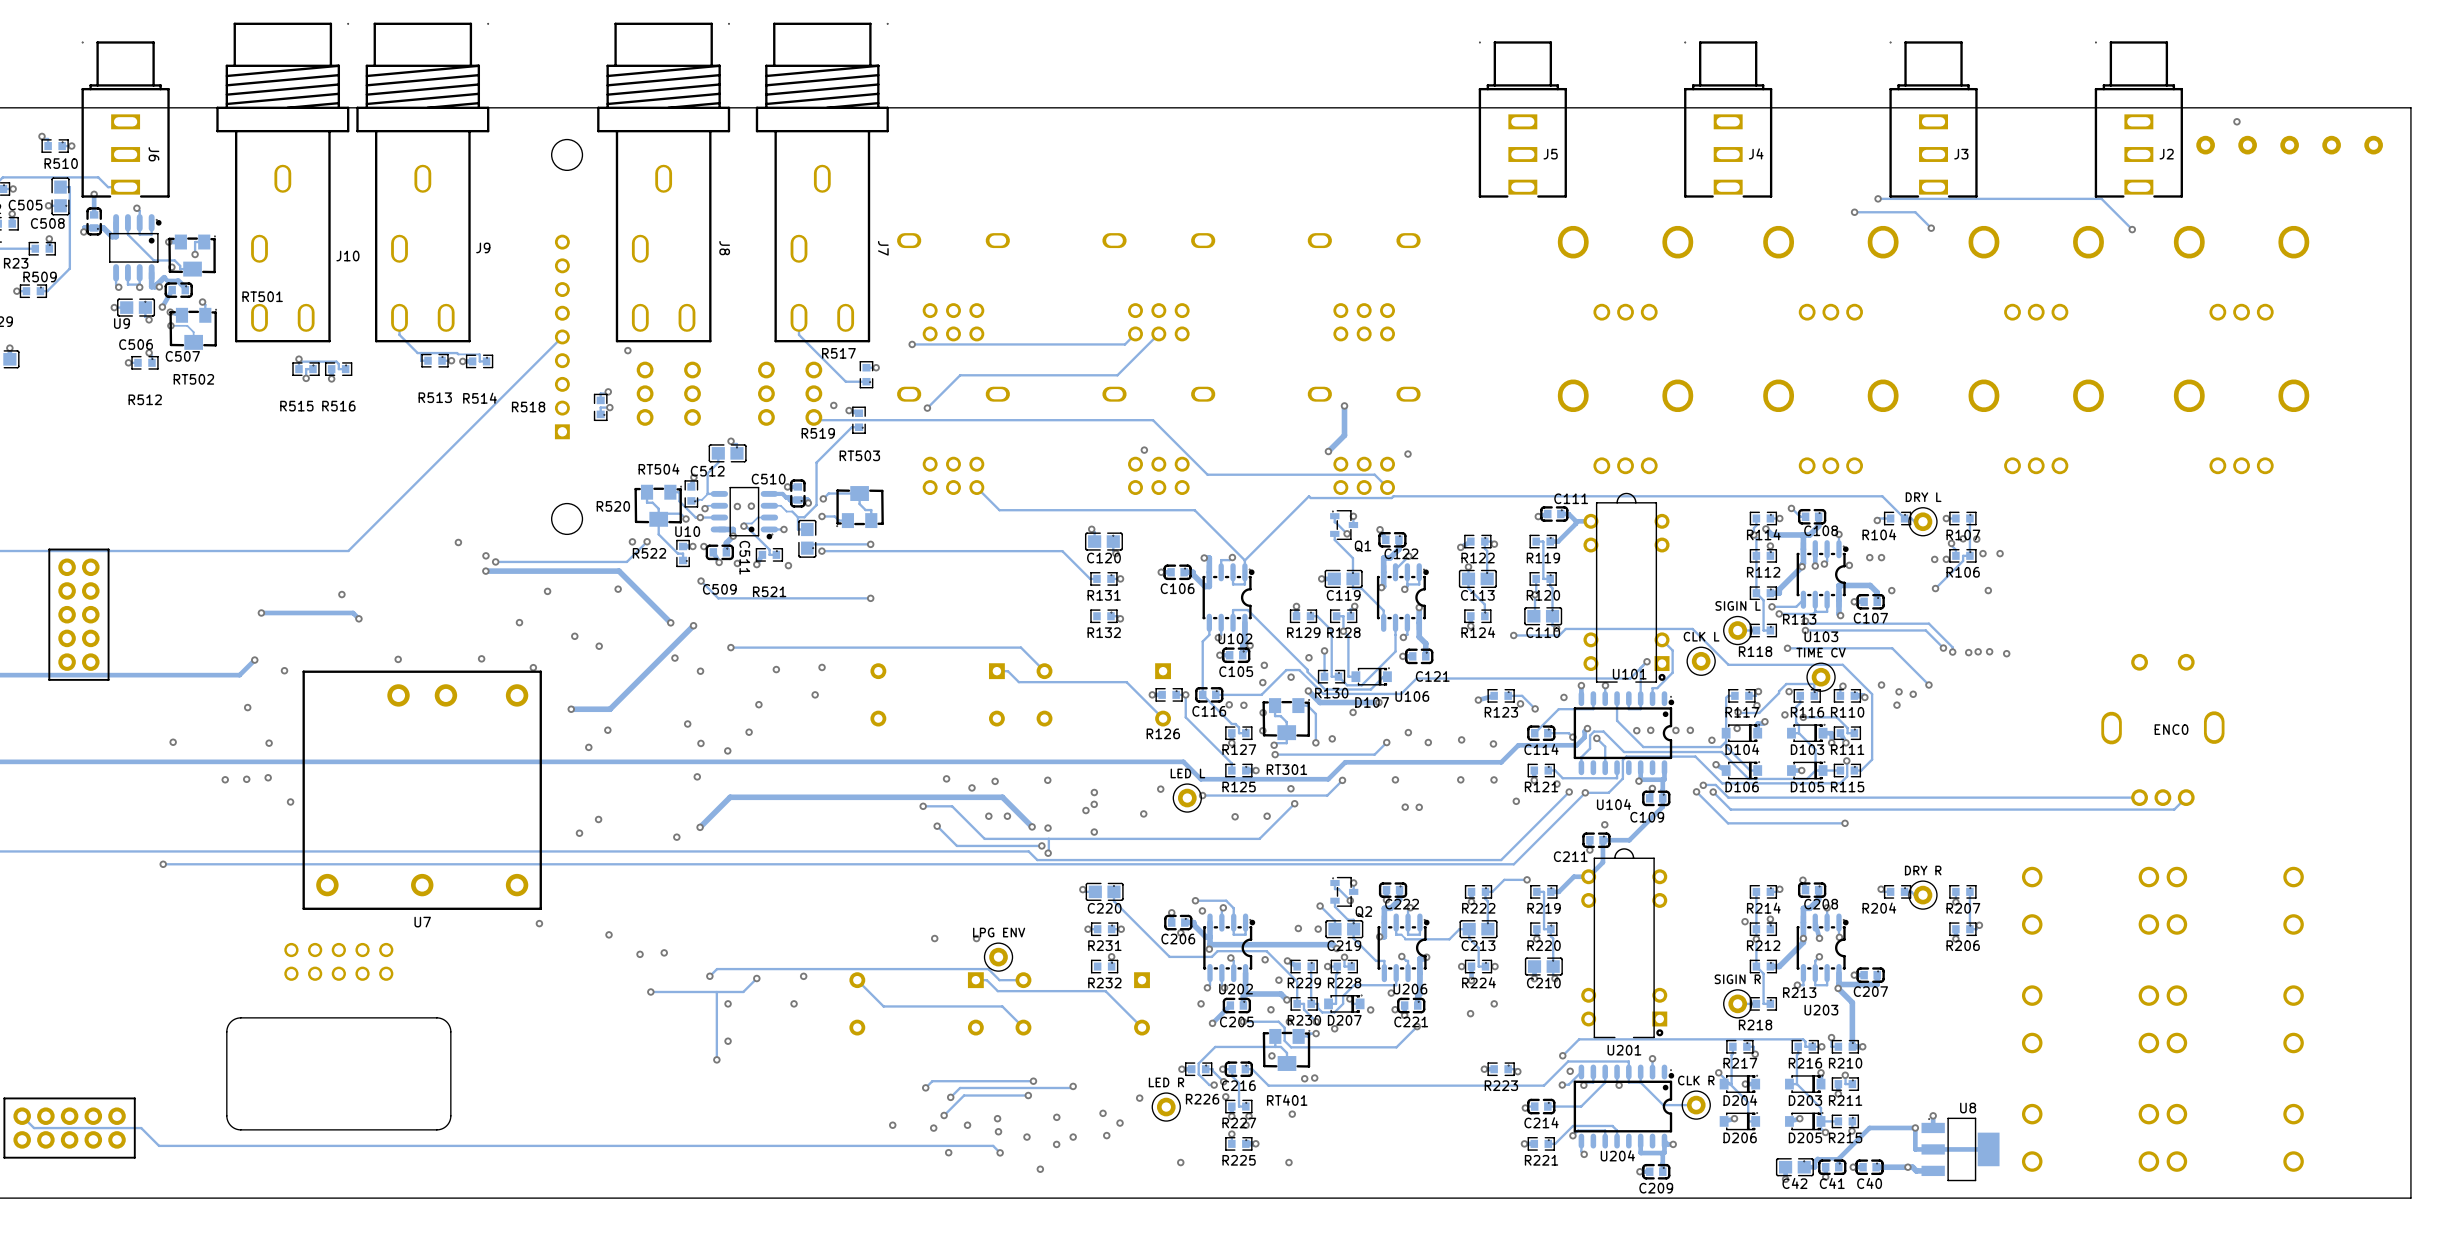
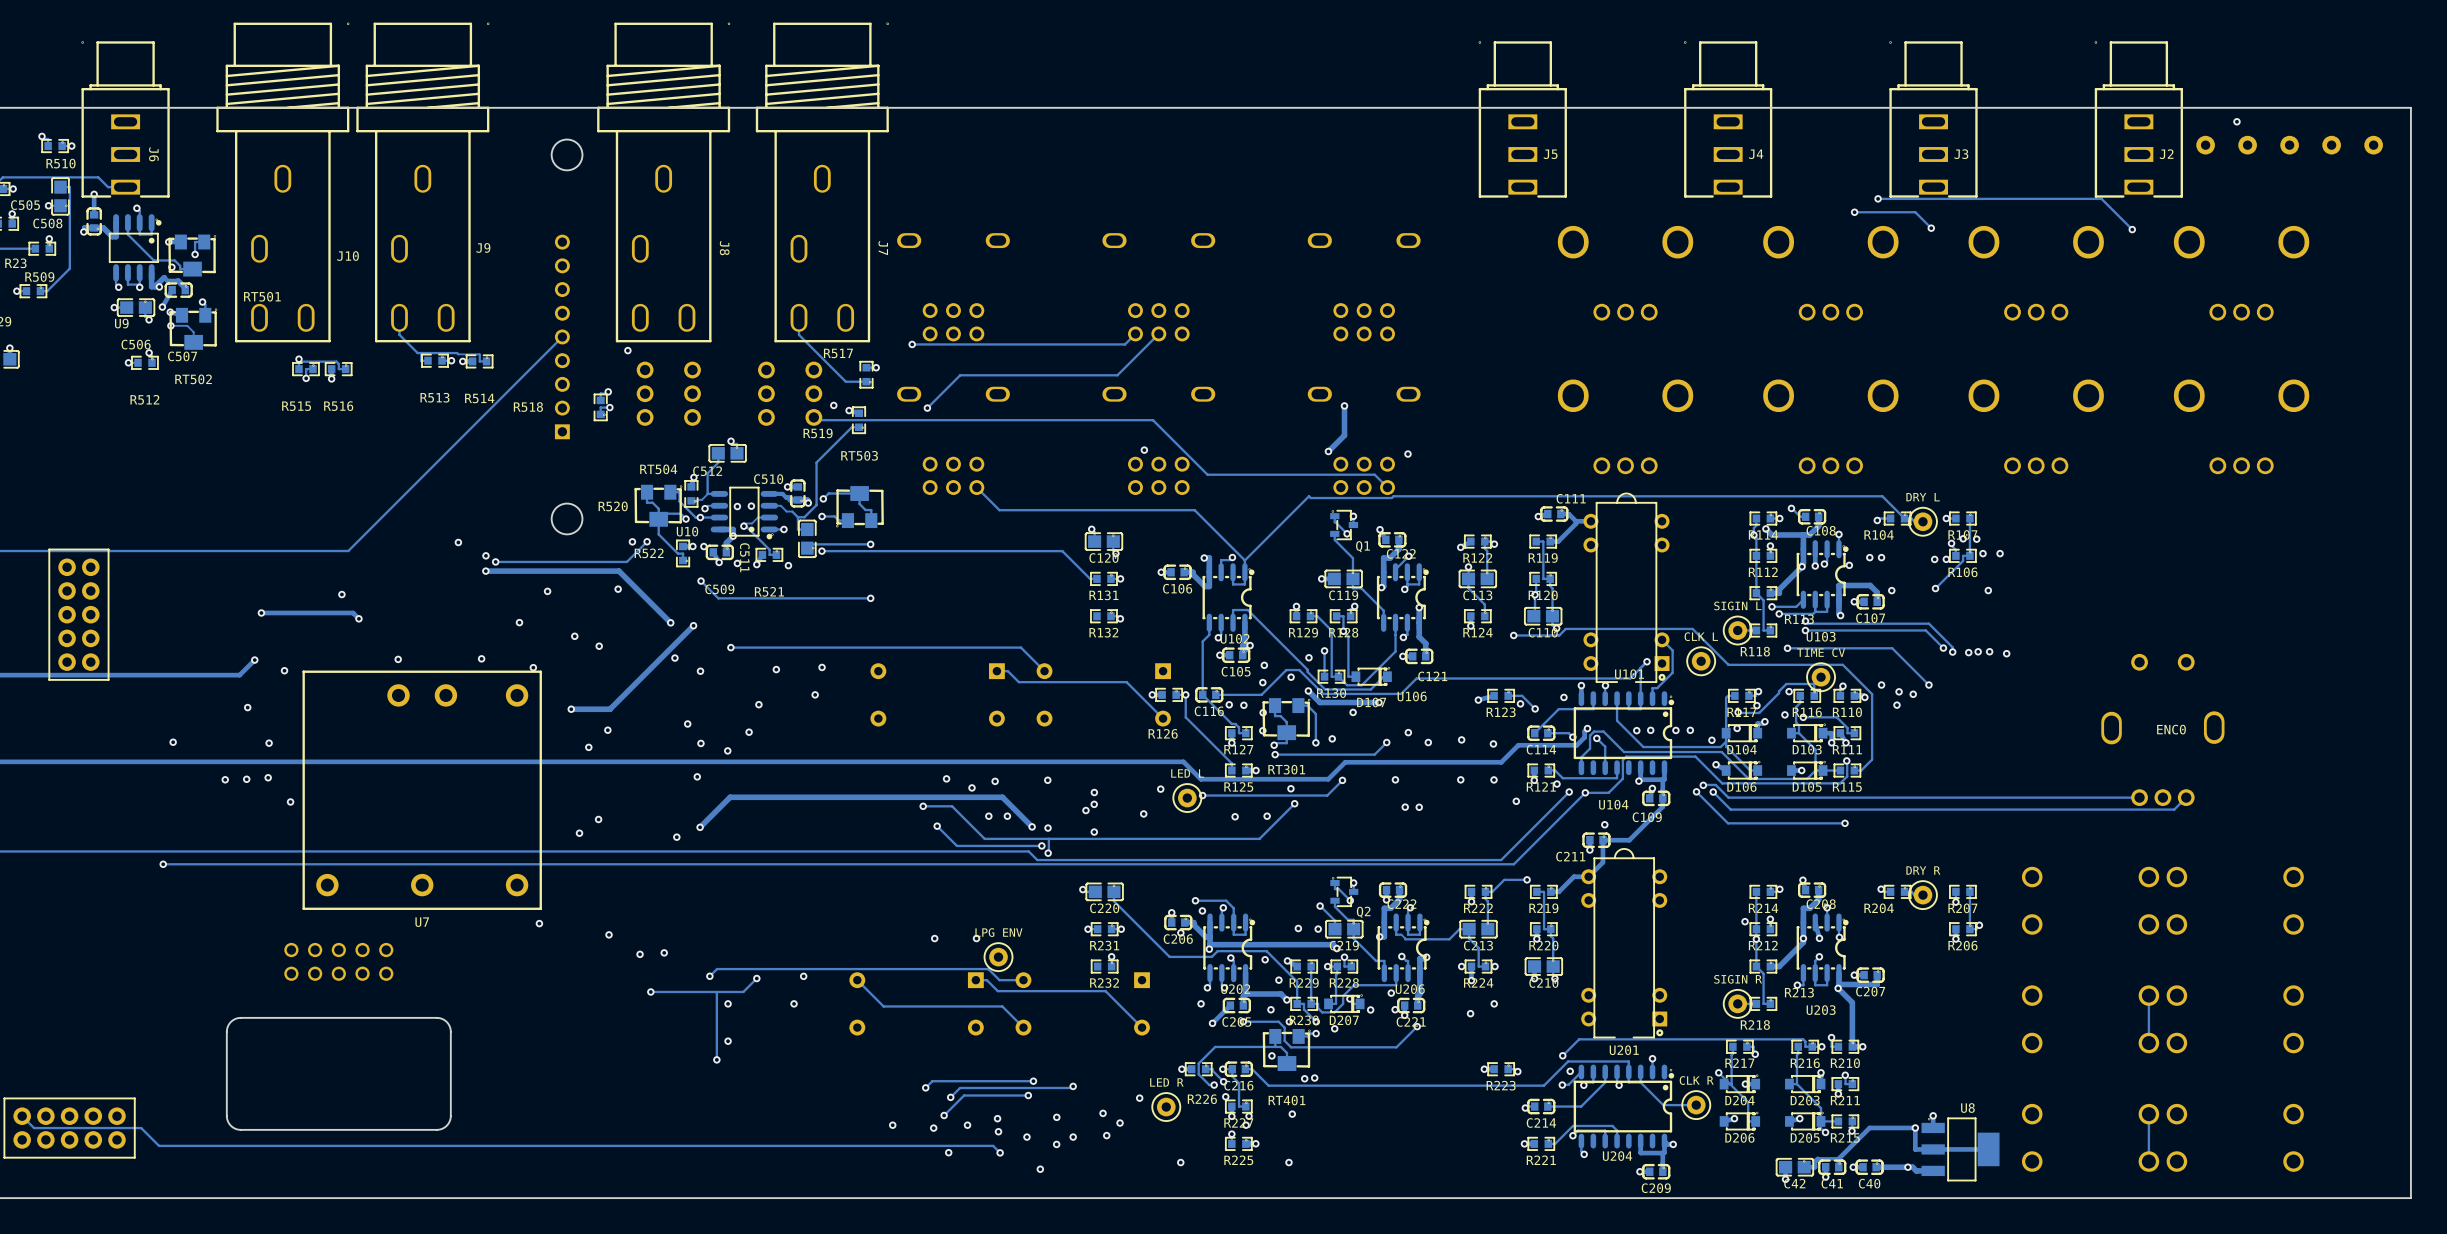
track: none -> (2148, 995) (2148, 1043)
track: none -> (2148, 1114) (2148, 1161)

